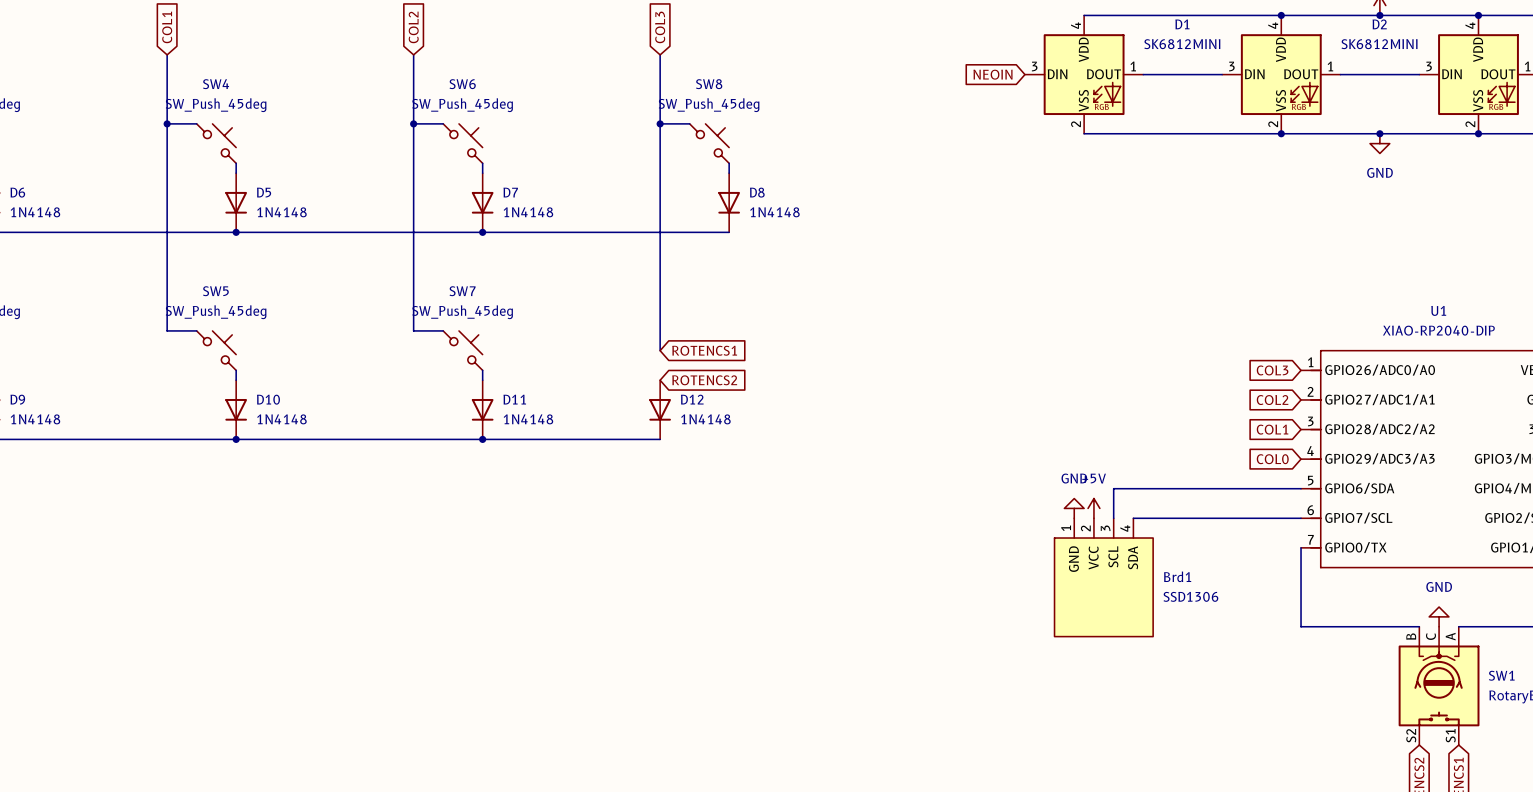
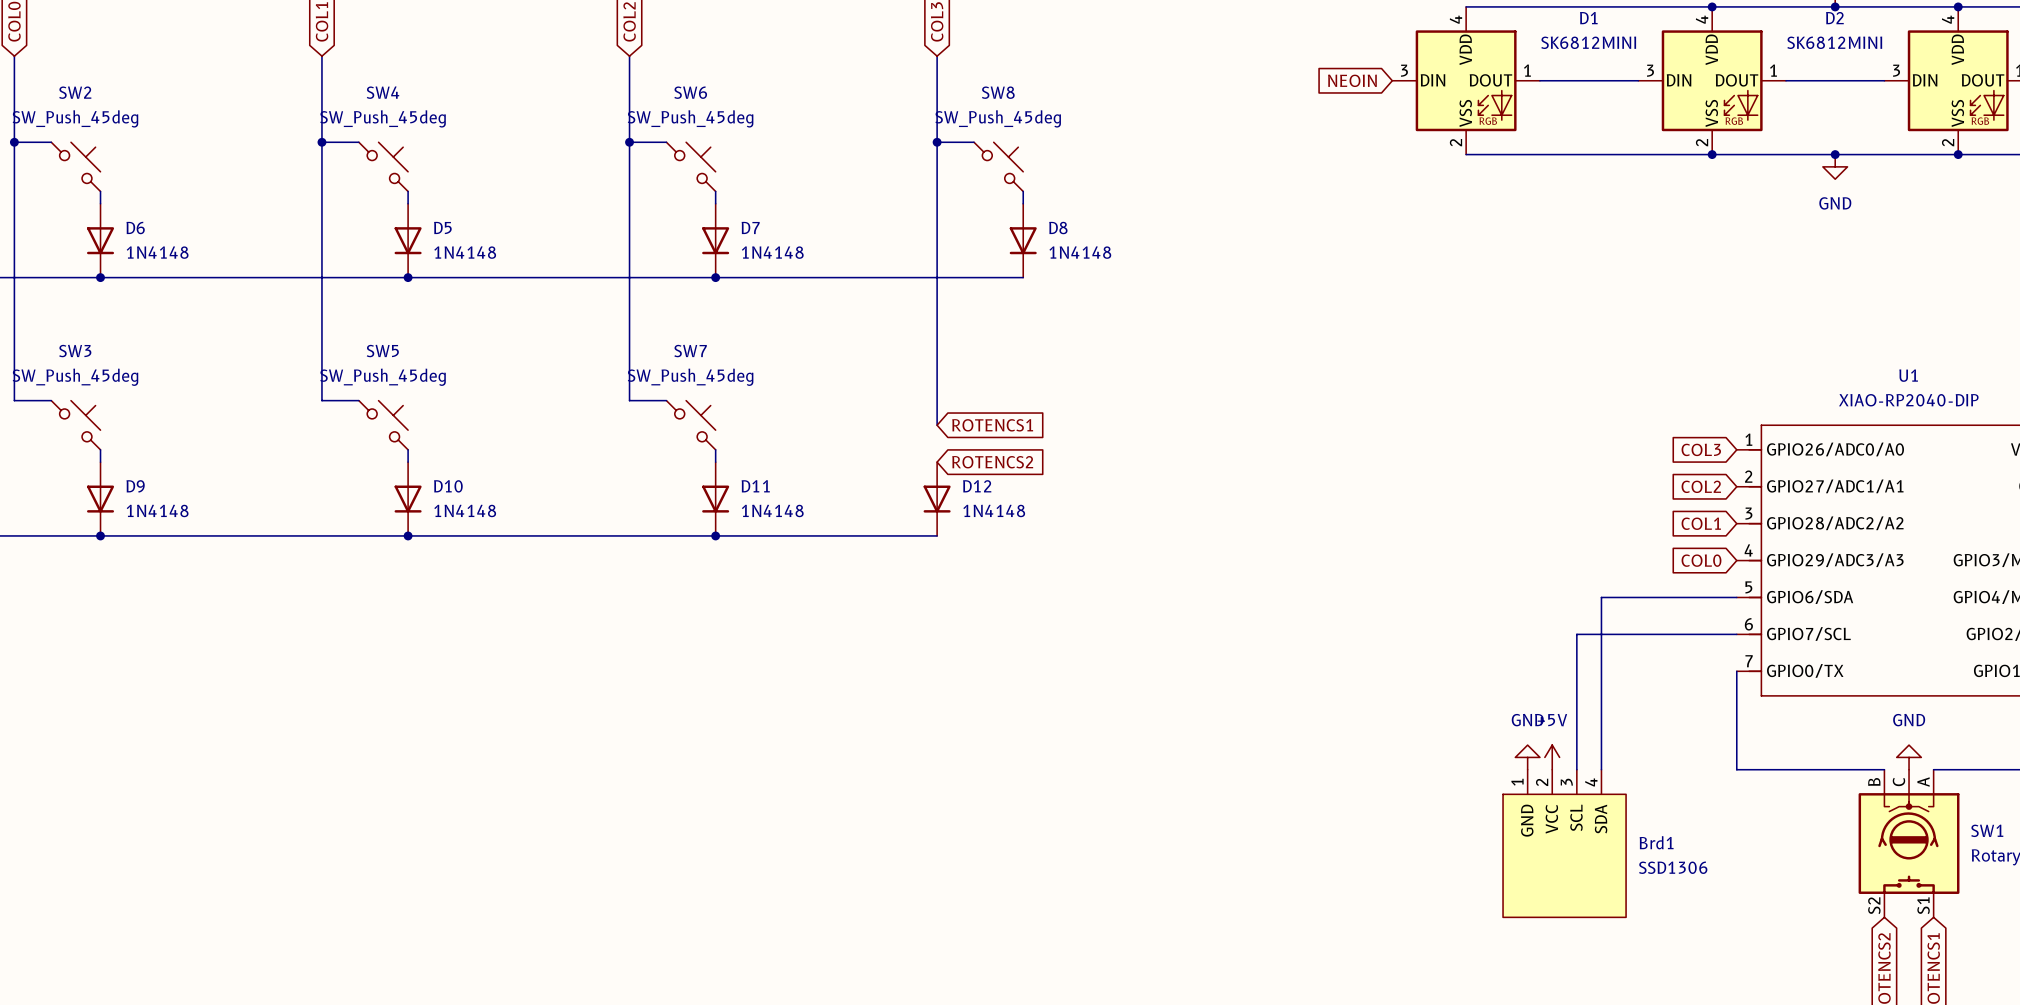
wire: (1192, 488) (1113, 488) (1113, 518) -> (1601, 597) (1601, 769)
power symbol position: GND (1074, 508) -> GND (1527, 757)
power symbol position: +5V (1093, 508) -> +5V (1552, 757)
wire: (1133, 518) (1172, 518) -> (1576, 769) (1576, 634)
Brd1 position: (1103, 577) -> (1564, 843)

